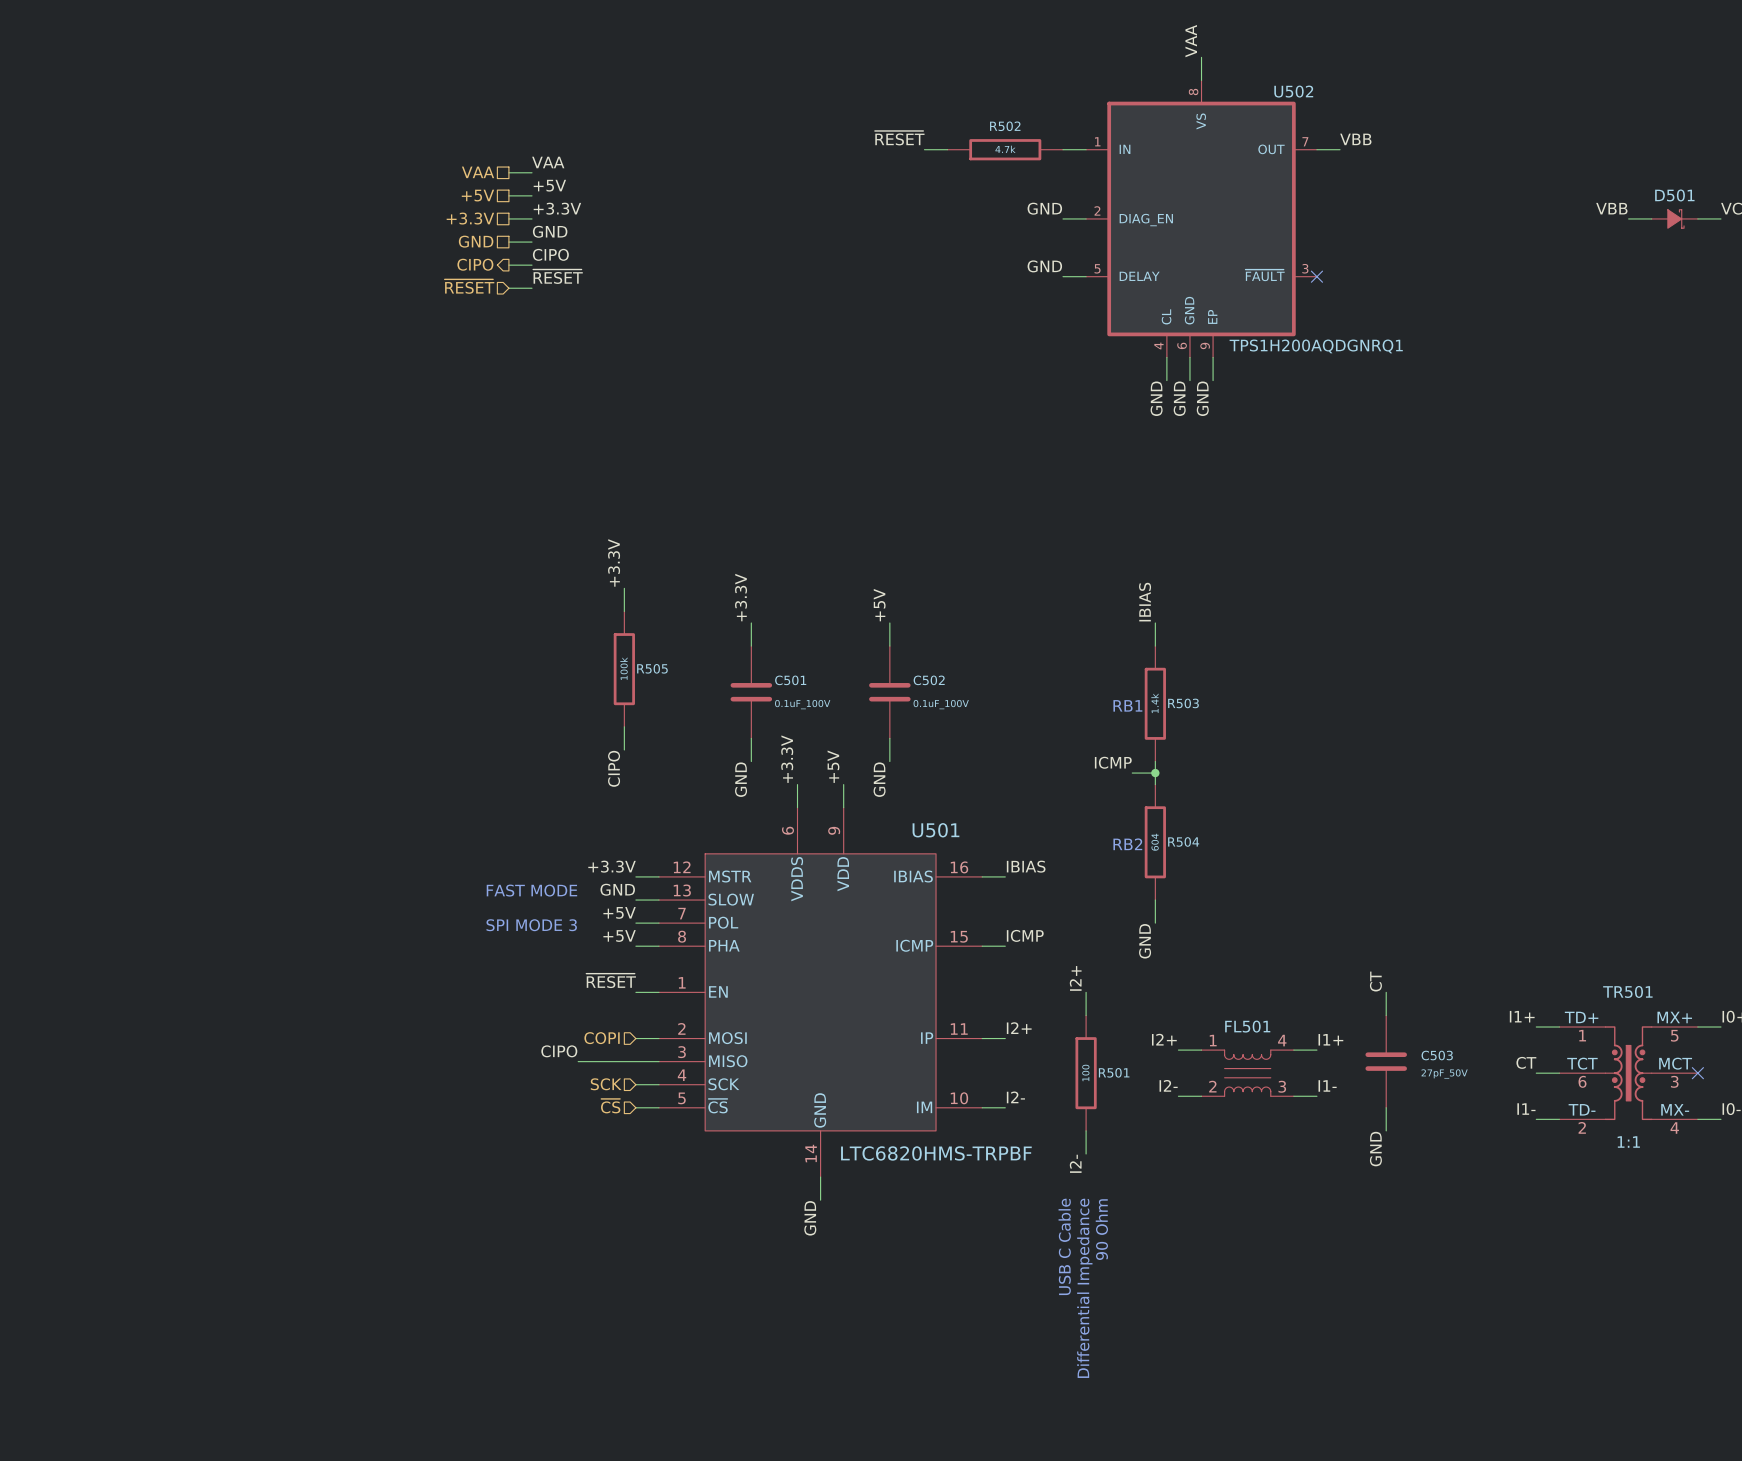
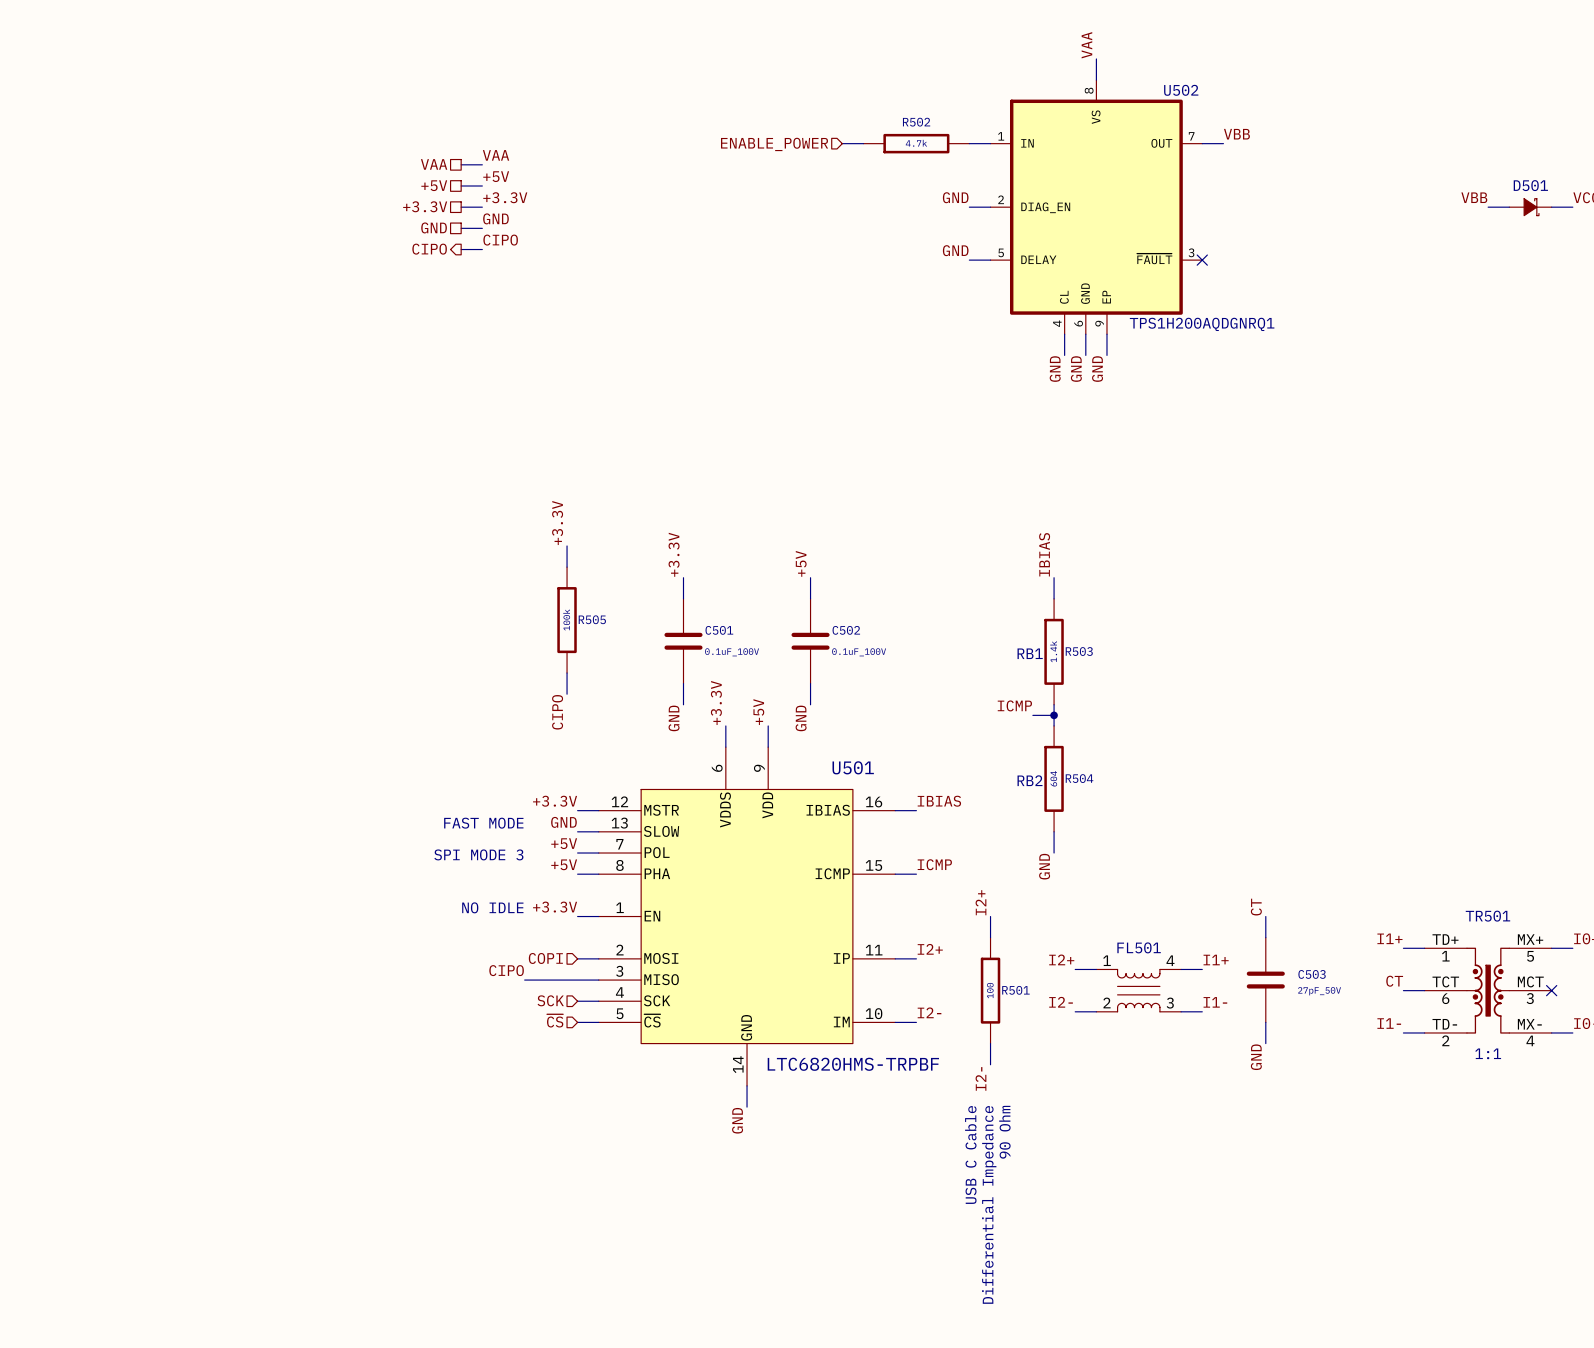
label: ~{RESET} (899, 138) -> none
hierarchical label: none -> ENABLE_POWER (774, 144)
label: ~{RESET} (557, 276) -> none
hierarchical label: ~{RESET} (469, 286) -> none
wire: (508, 288) (532, 288) -> none
label: ~{RESET} (611, 980) -> +3.3V (555, 907)
text: none -> NO IDLE (492, 907)

